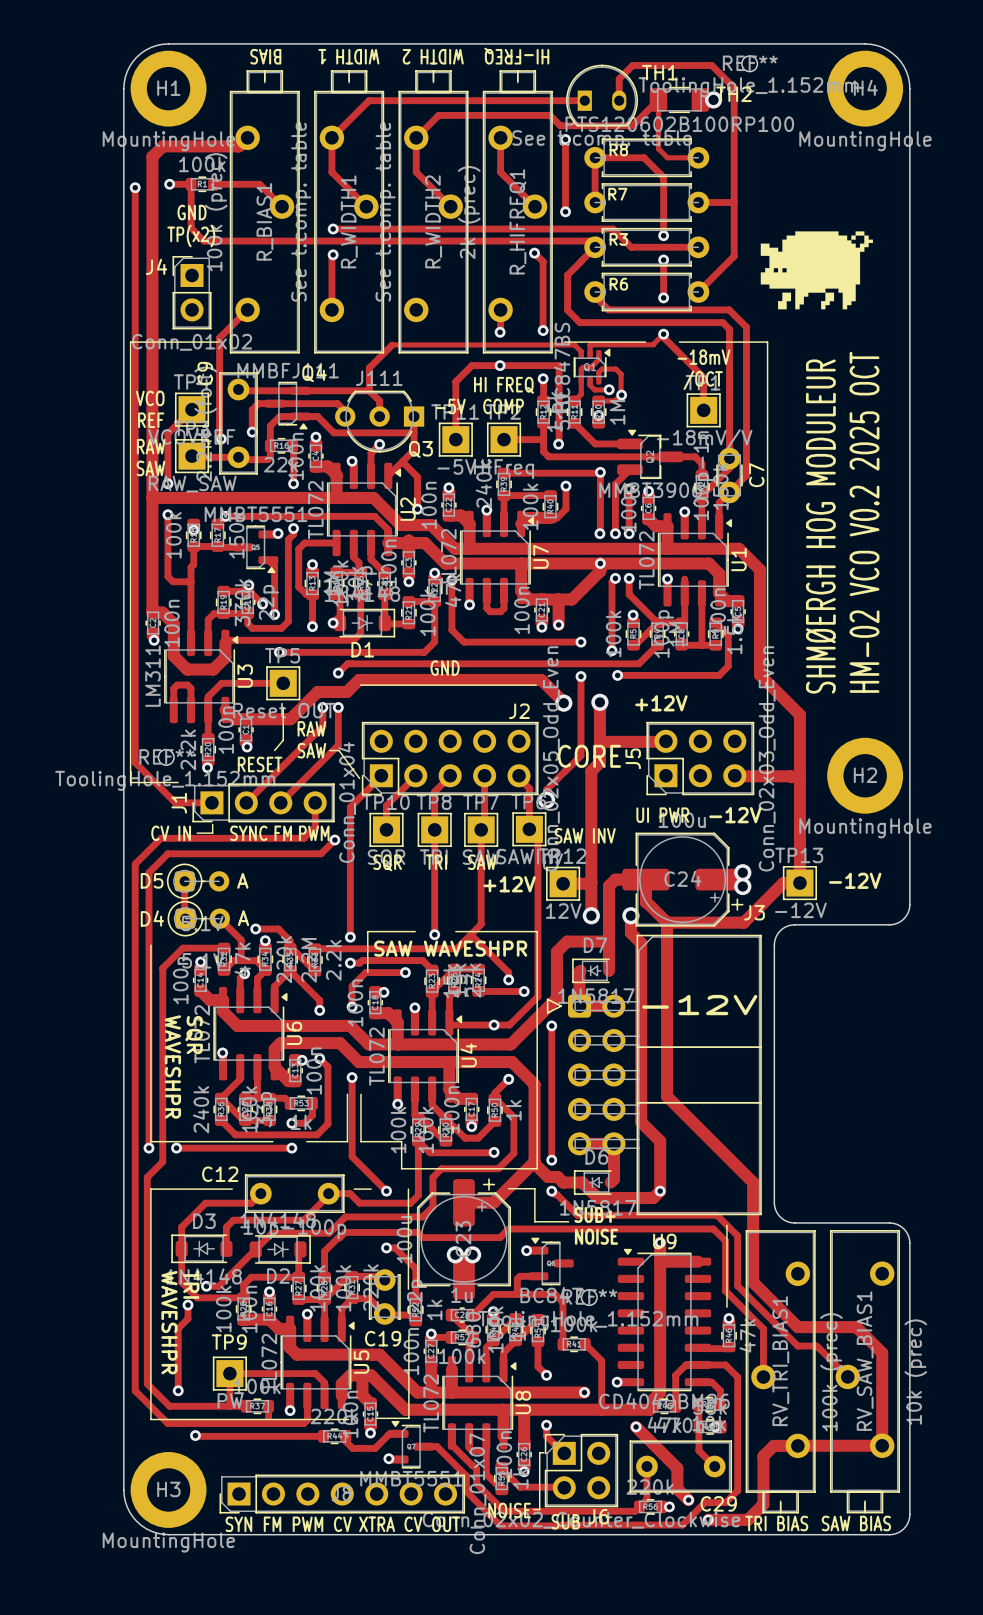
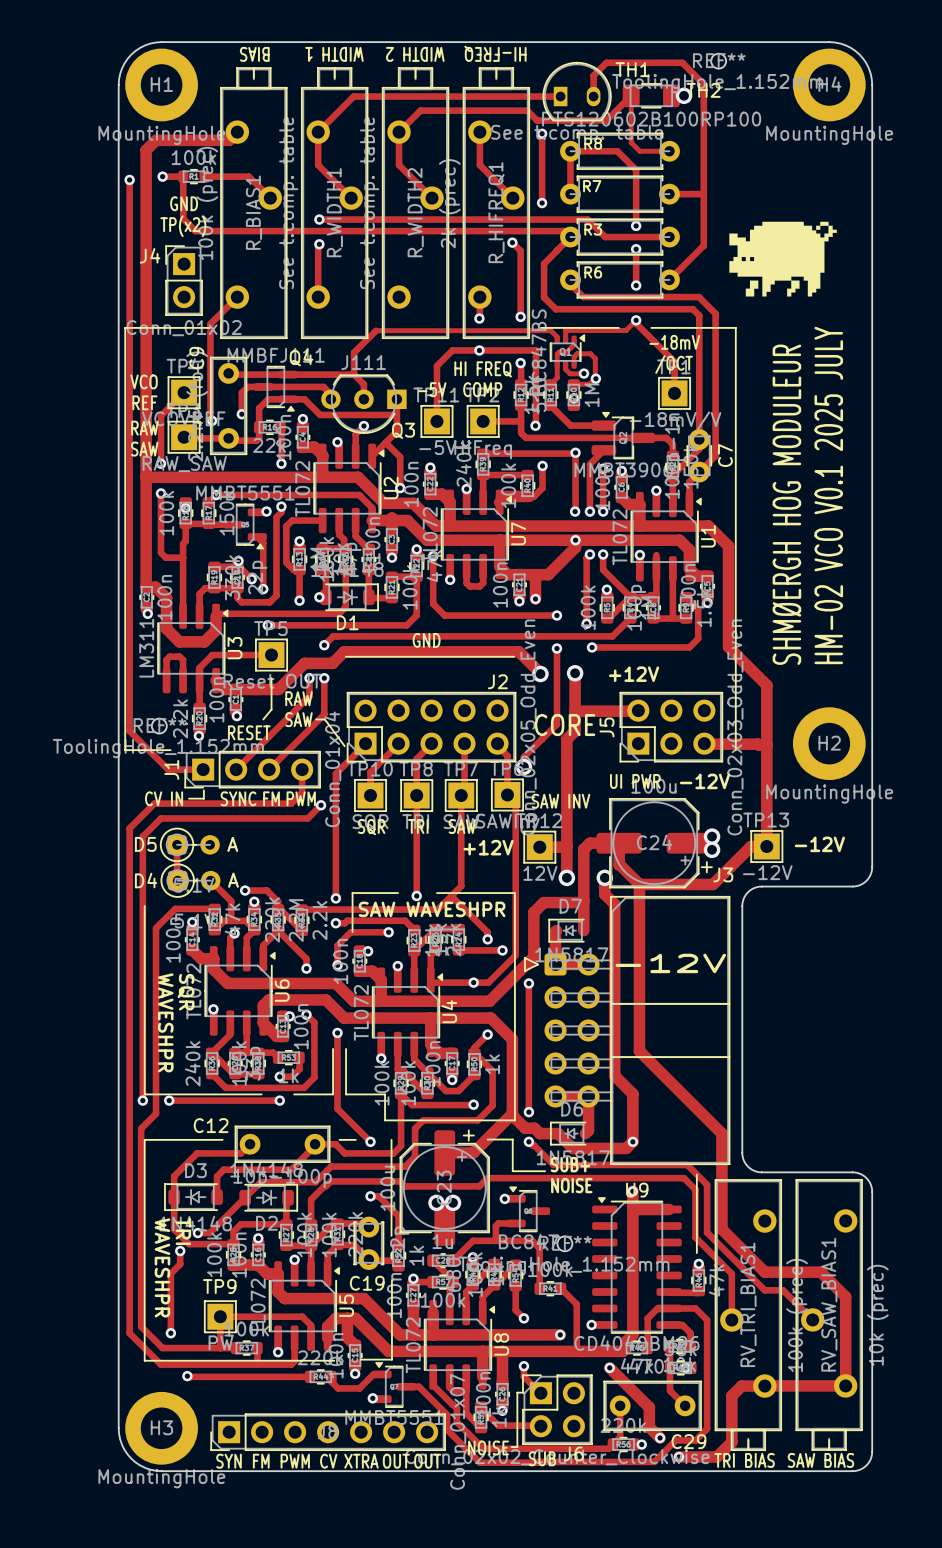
text: HM-02 VCO V0.2 2025 OCT (864, 522) -> HM-02 VCO V0.1 2025 JULY (828, 495)
text: CV (413, 1524) -> OUT (396, 1461)

